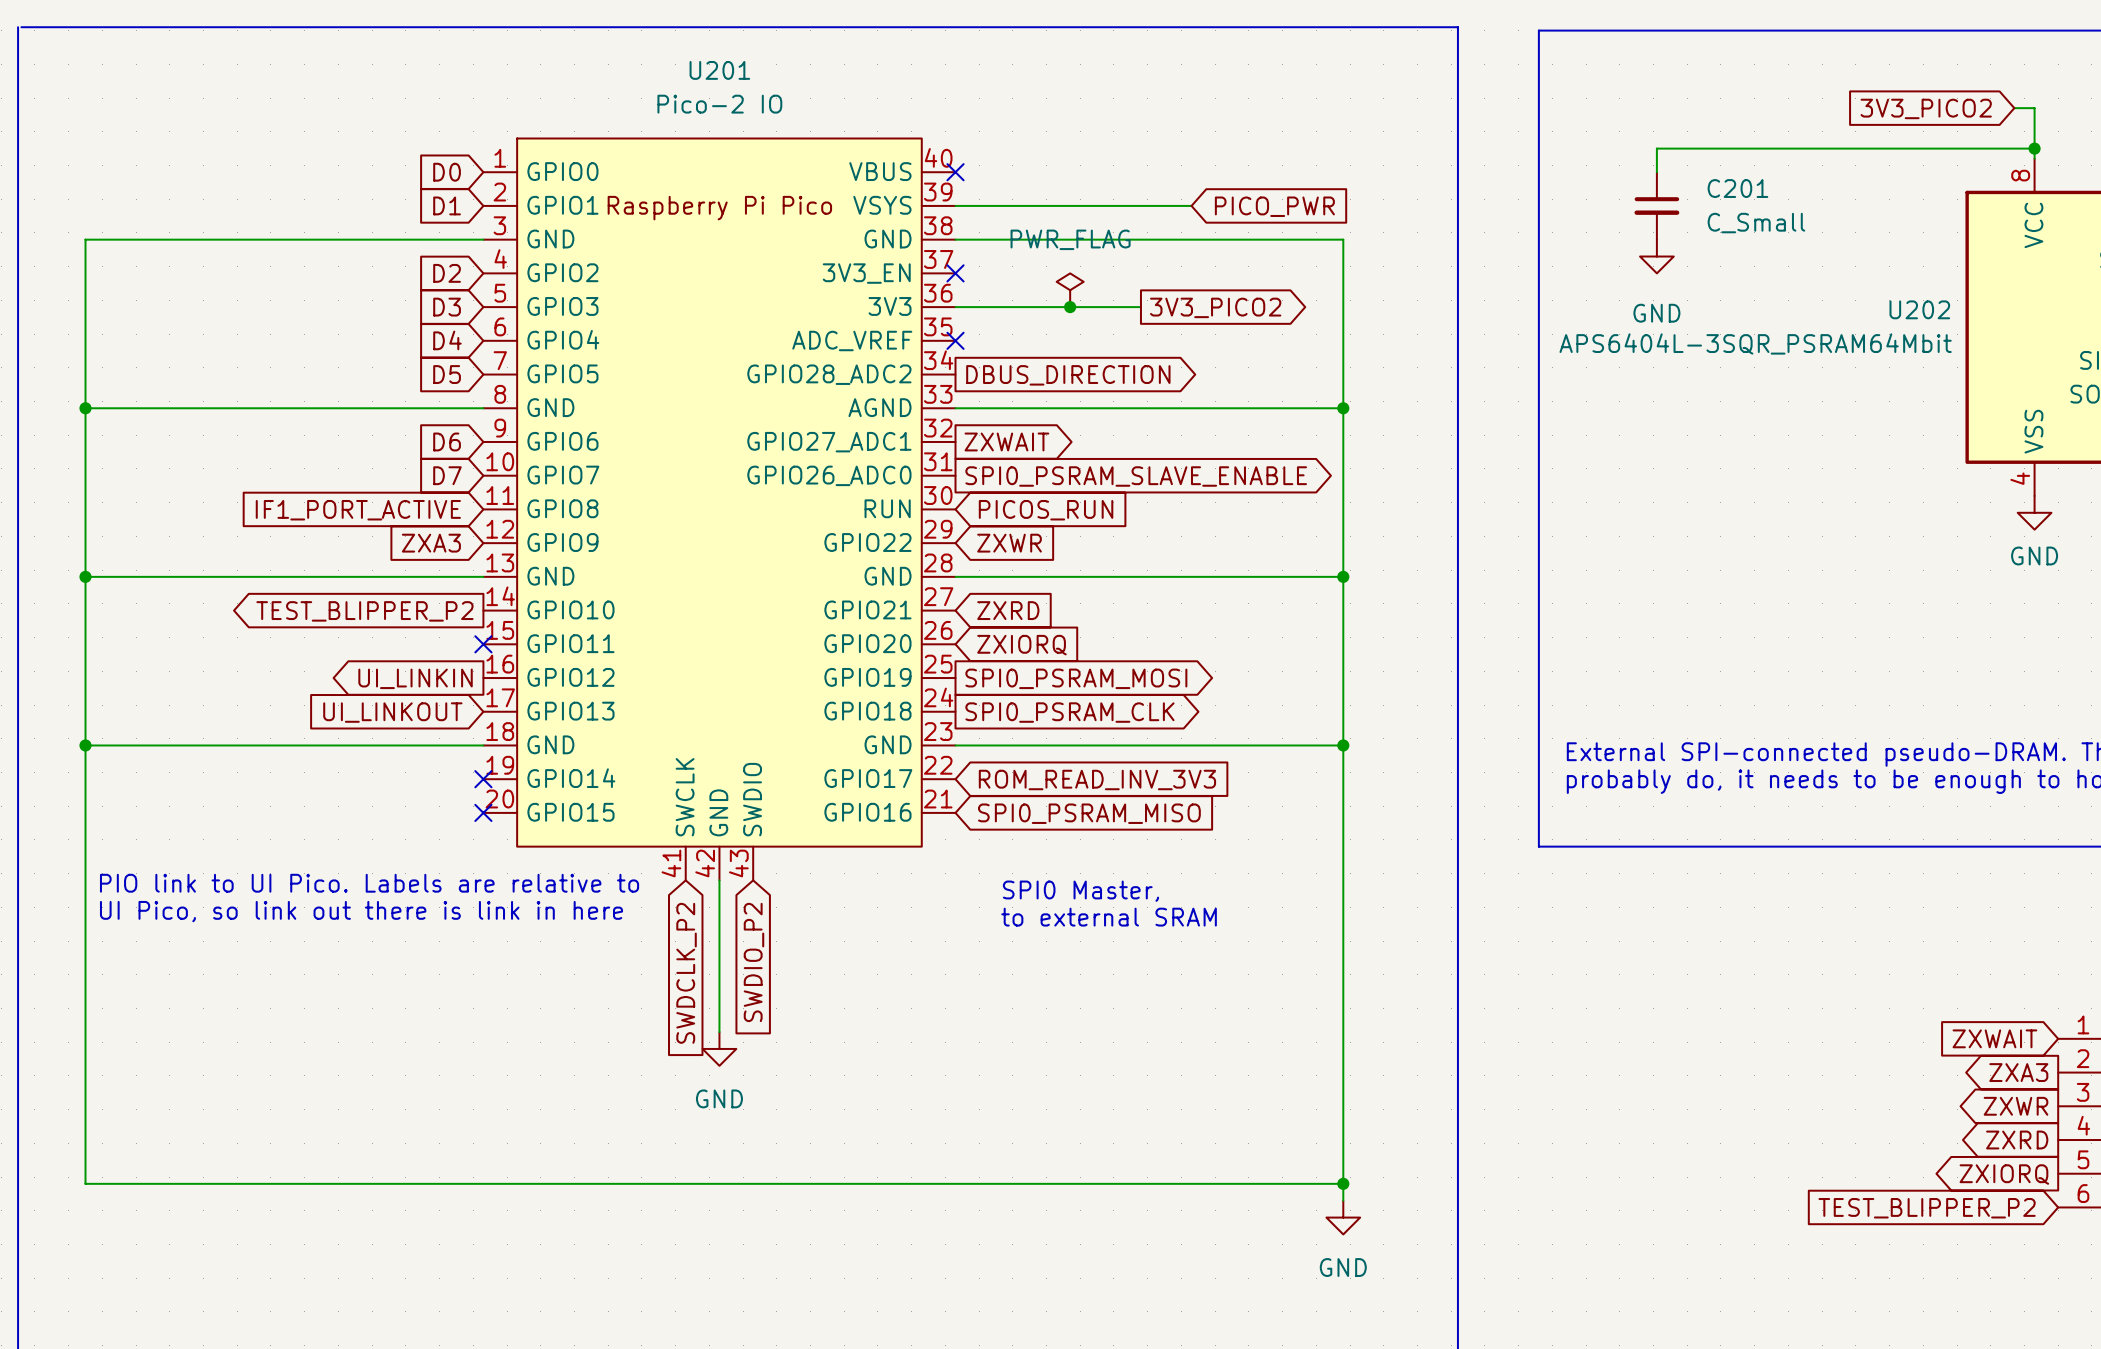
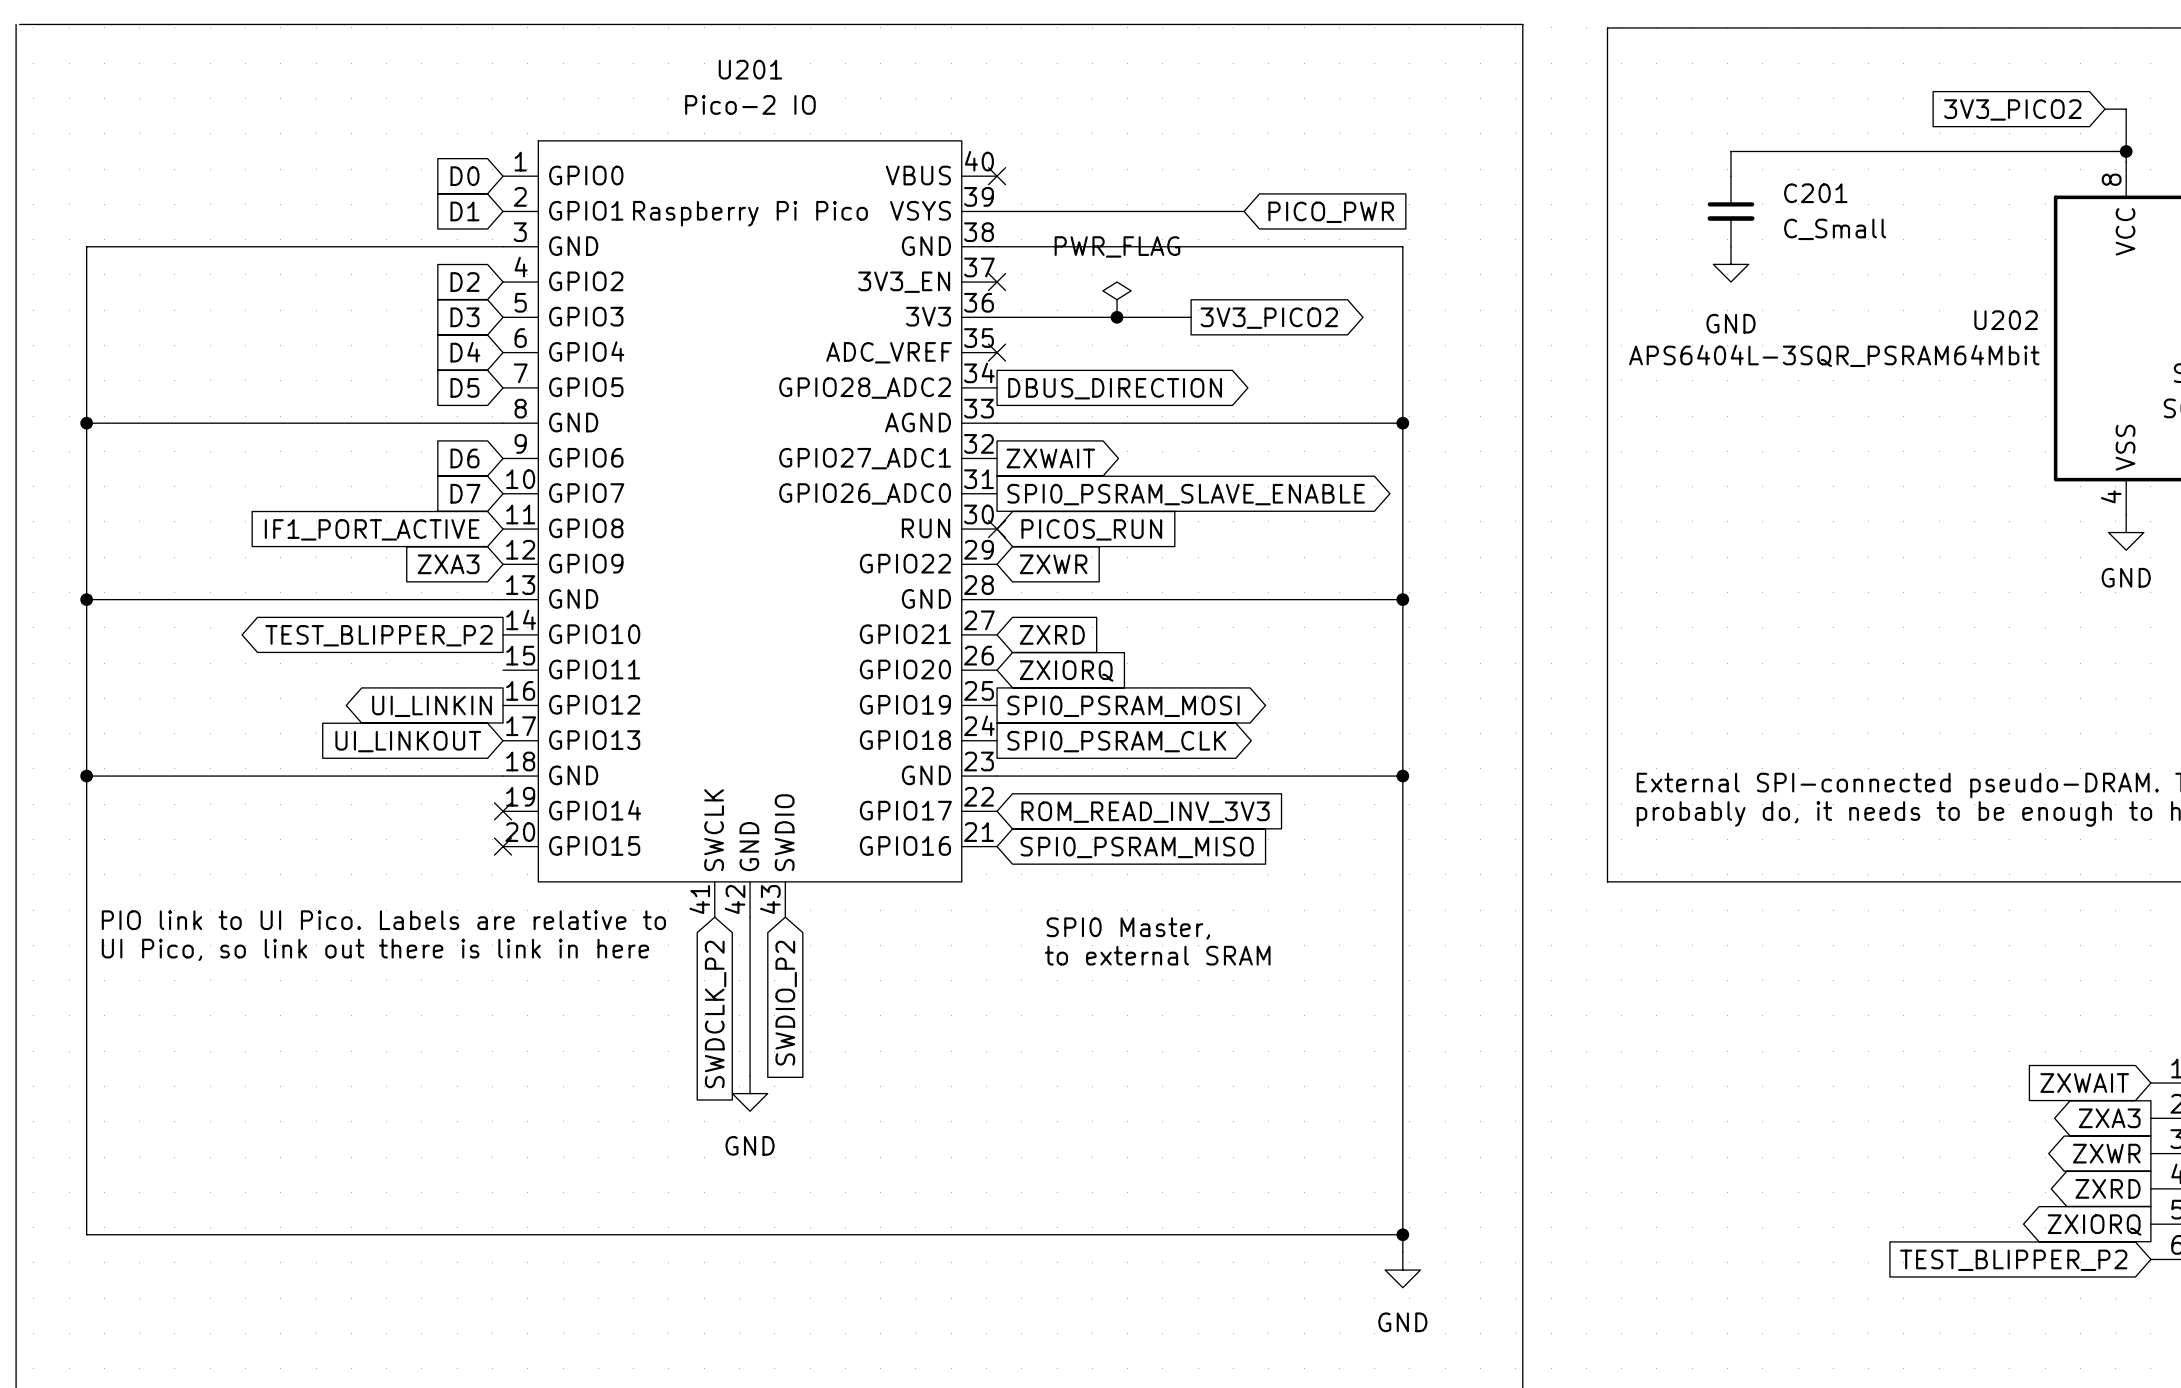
no-connect mark: none -> (997, 529)
no-connect mark: (483, 644) -> none

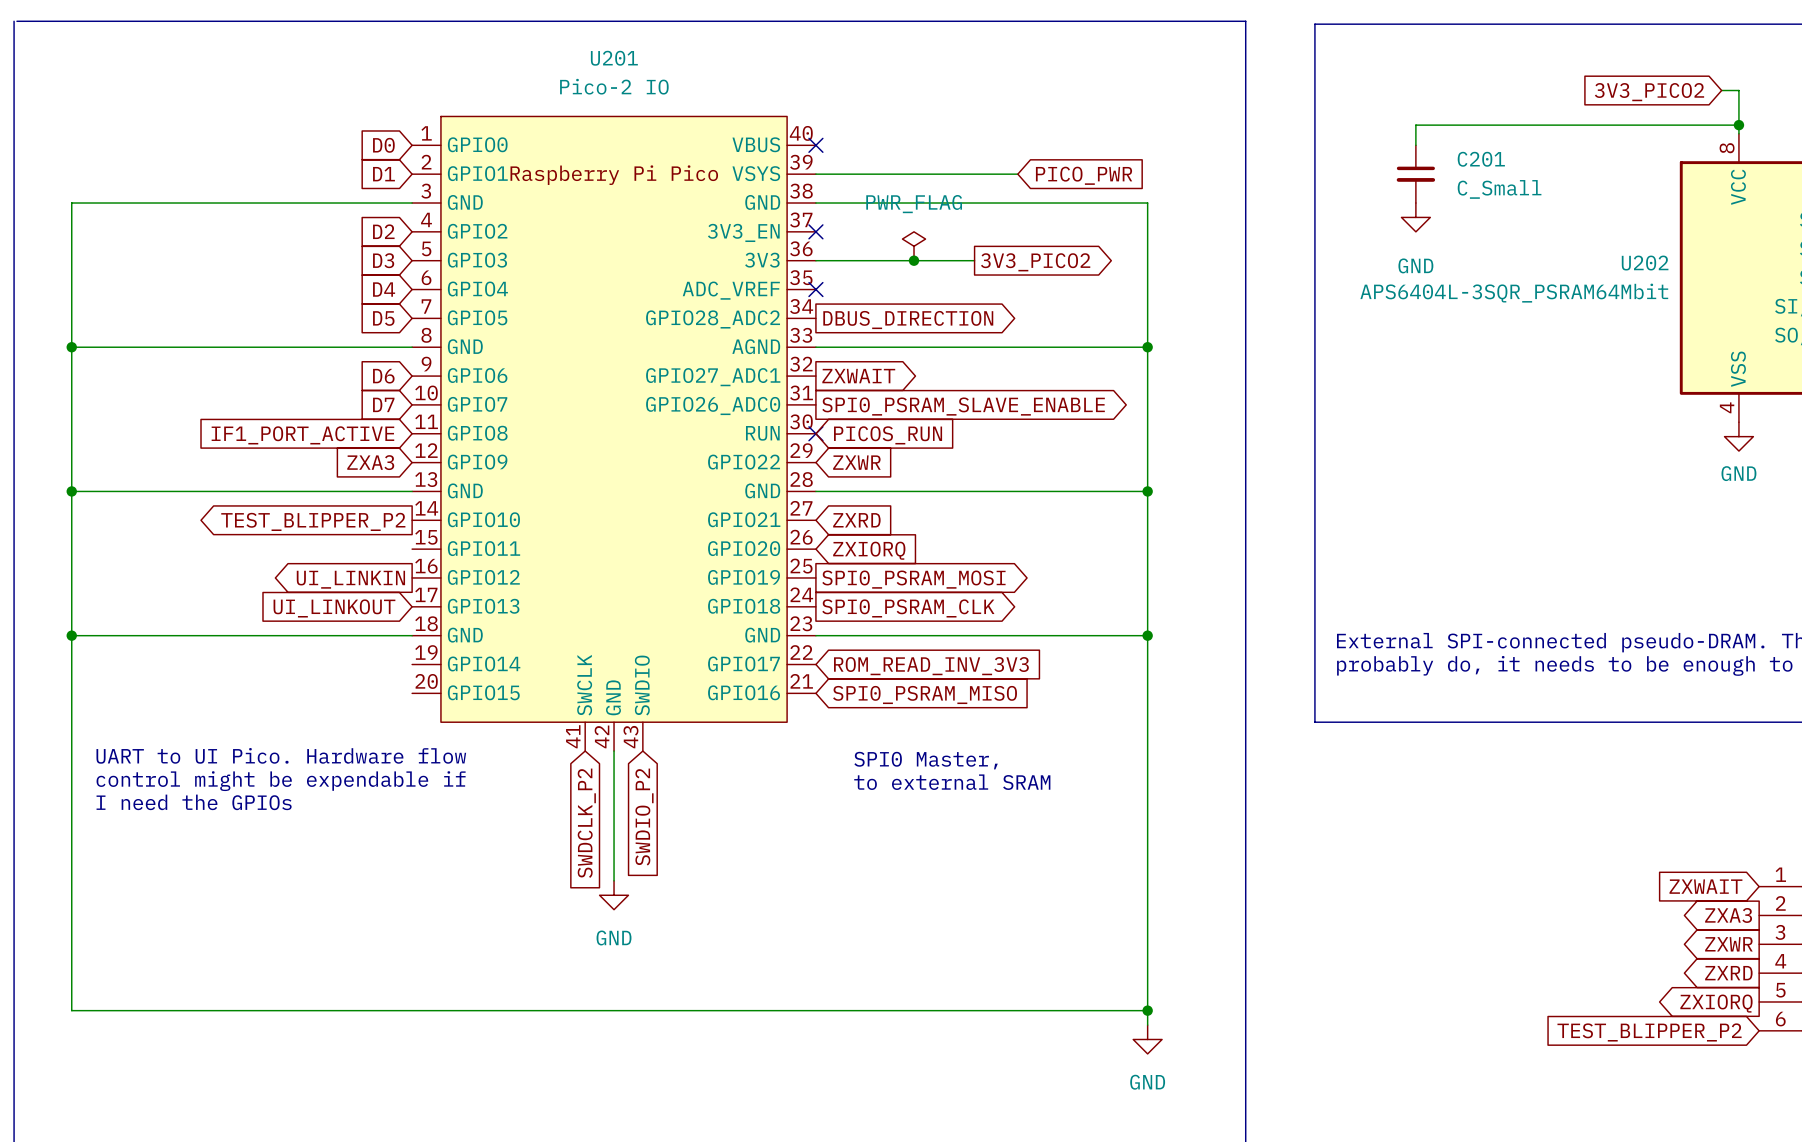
no-connect mark: (503, 811) -> none
no-connect mark: (503, 846) -> none
text: PIO link to UI Pico. Labels are relative to (383, 920) -> none
text: none -> UART to UI Pico. Hardware flow (281, 755)
text: UI Pico, so link out there is link in here (375, 949) -> none
text: none -> control might be expendable if (281, 781)
text: none -> I need the GPIOs (194, 802)

